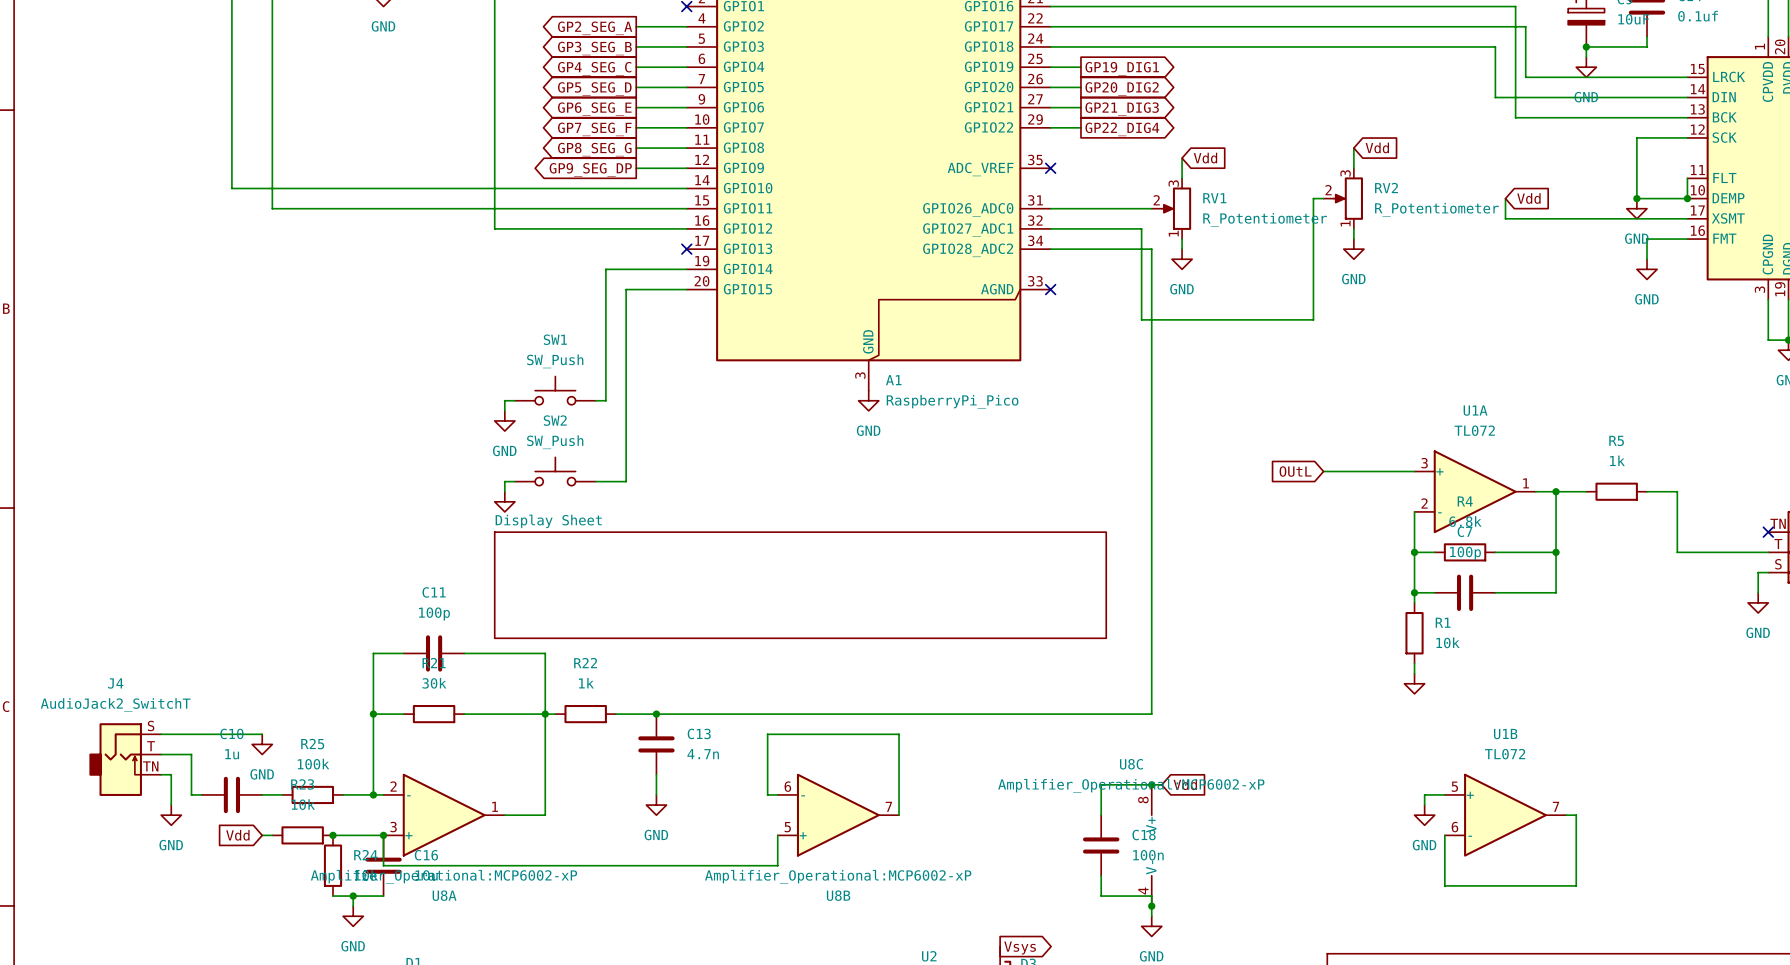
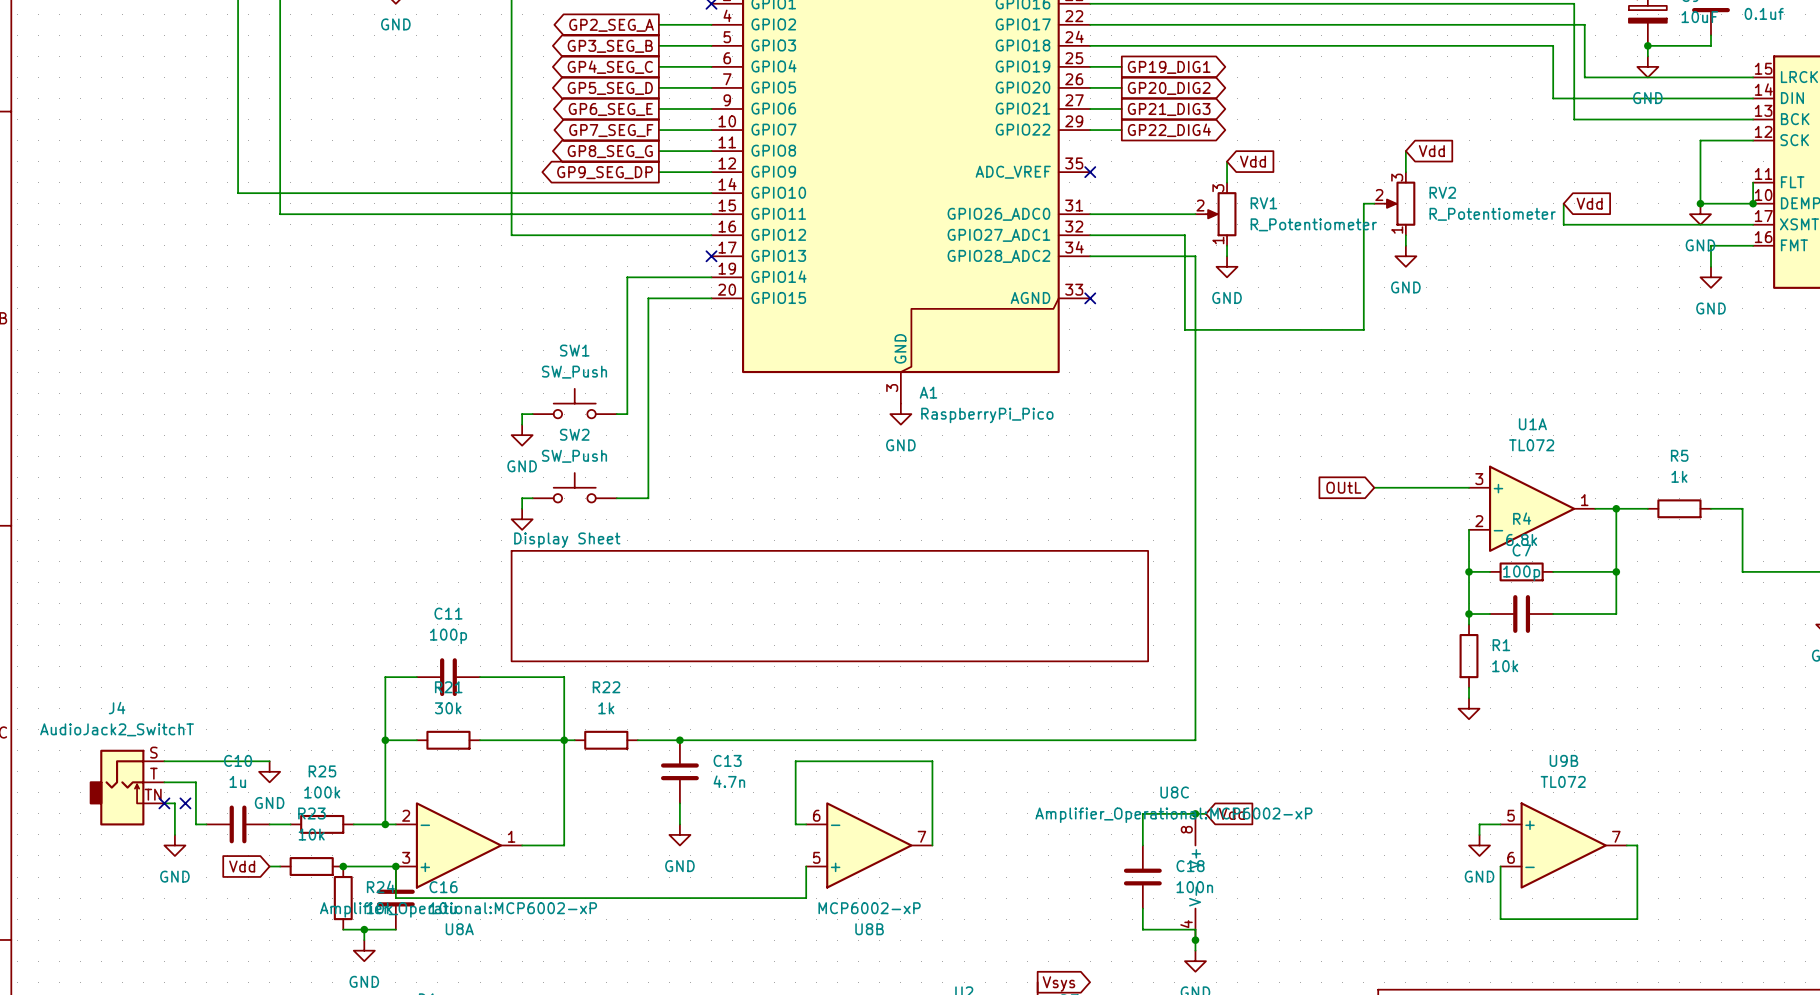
U1B name: U1B (1505, 734) -> U9B (1563, 760)
no-connect mark: none -> (164, 803)
no-connect mark: none -> (185, 803)
U8B value: Amplifier_Operational:MCP6002-xP (838, 876) -> MCP6002-xP (869, 908)

